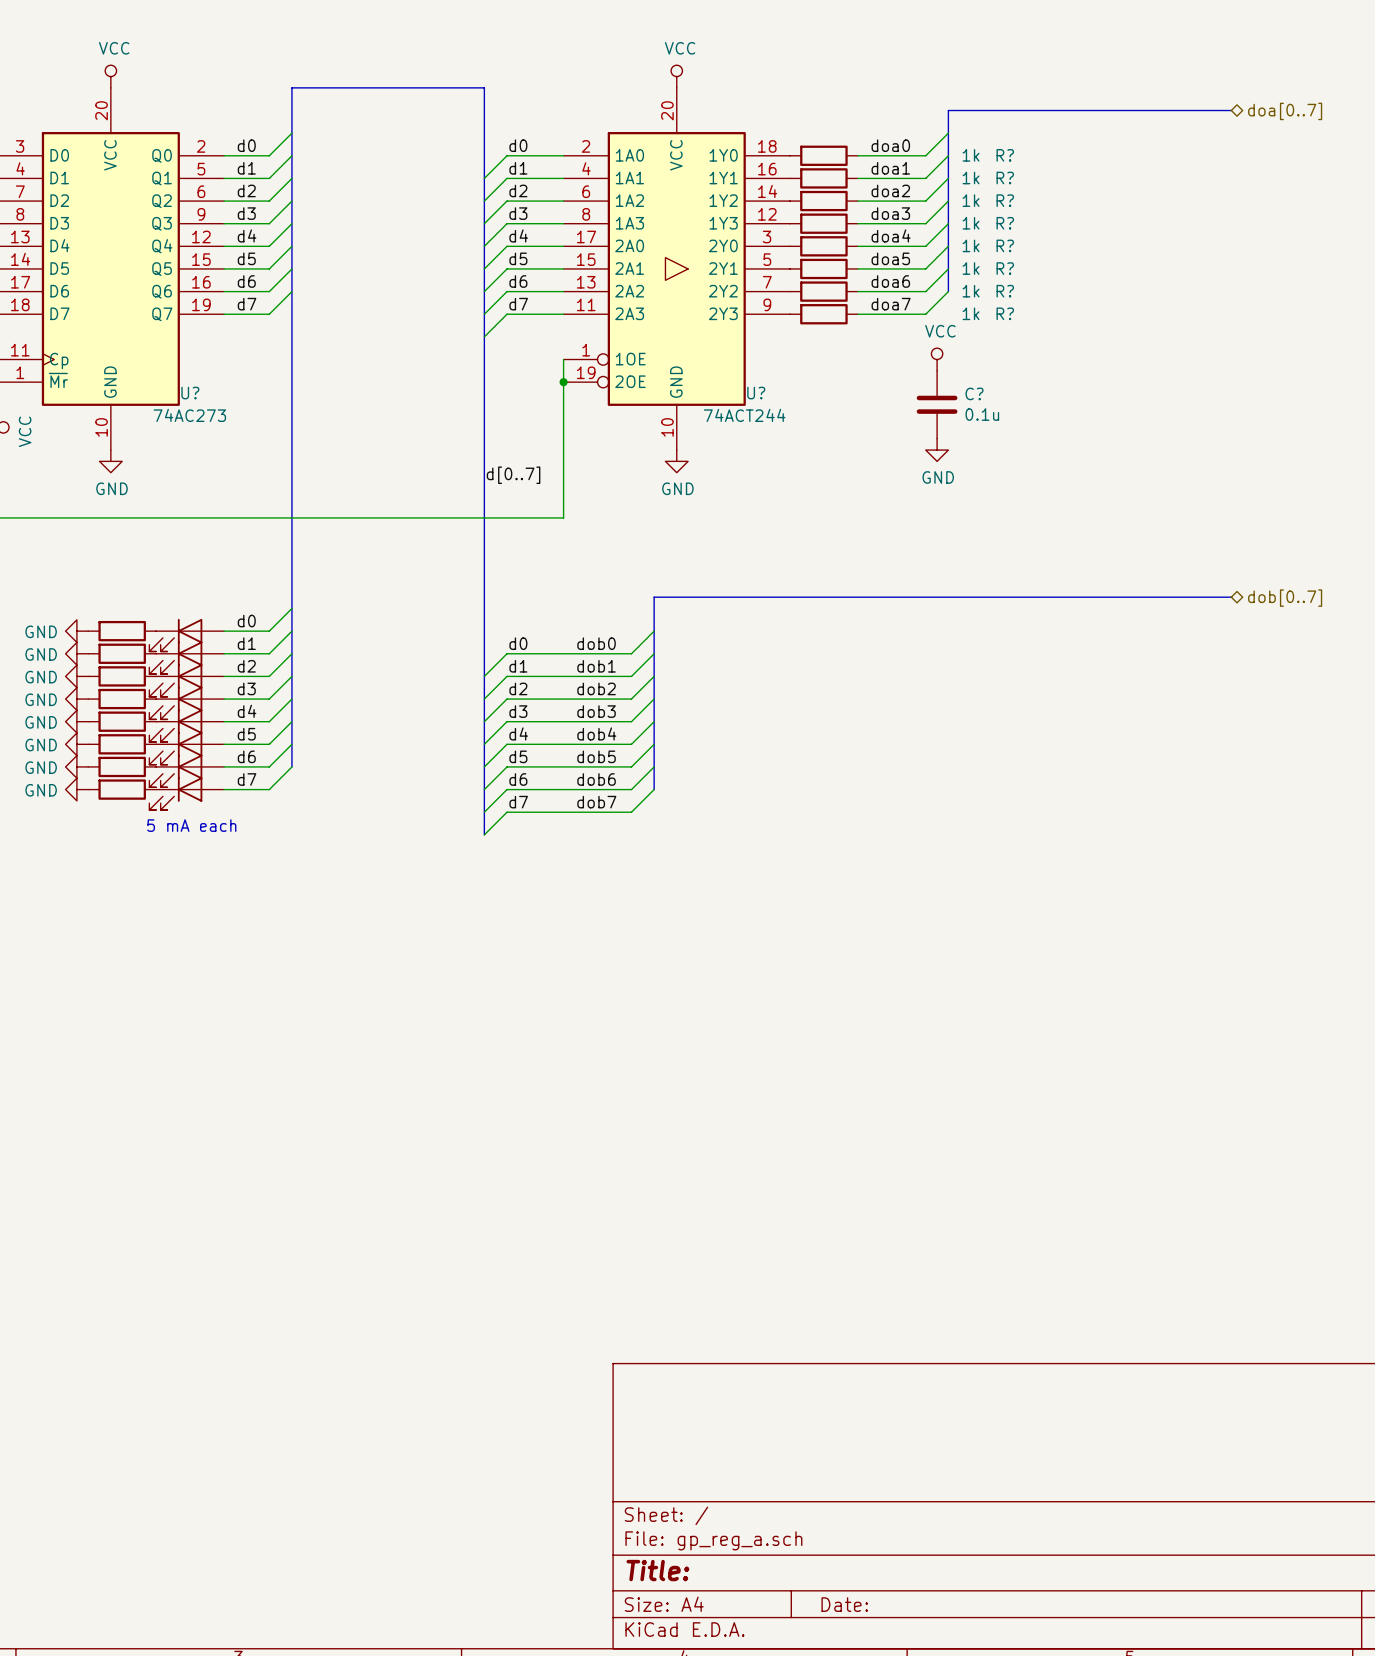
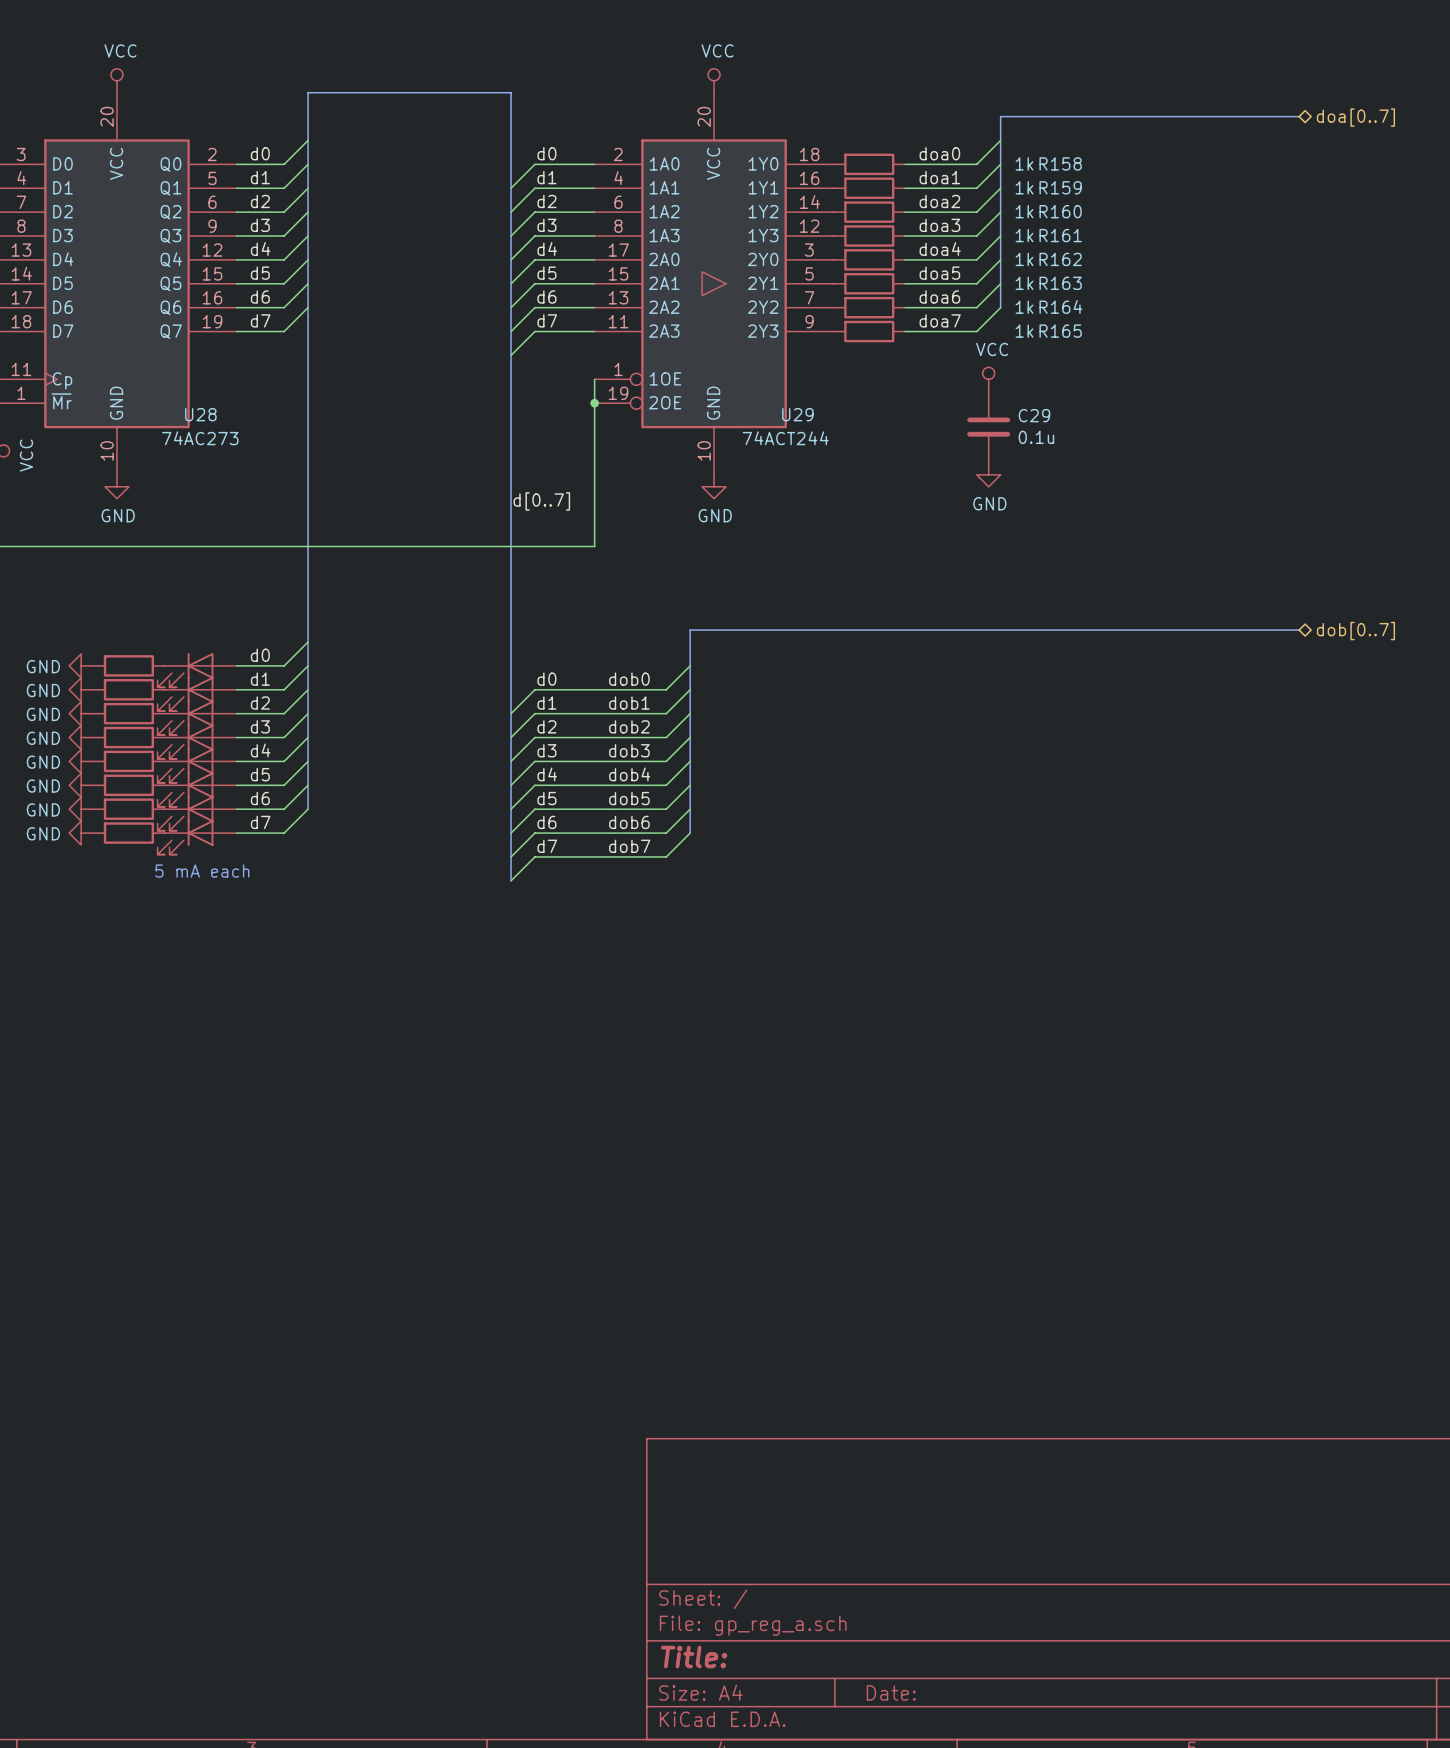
R? name: R? (1005, 155) -> R158 (1060, 163)
R? name: R? (1005, 178) -> R159 (1060, 187)
R? name: R? (1005, 200) -> R160 (1060, 211)
R? name: R? (1005, 223) -> R161 (1060, 235)
R? name: R? (1005, 245) -> R162 (1060, 259)
R? name: R? (1005, 268) -> R163 (1060, 283)
R? name: R? (1005, 291) -> R164 (1060, 306)
R? name: R? (1005, 313) -> R165 (1060, 331)
U? name: U? (190, 393) -> U28 (200, 414)
U? name: U? (756, 393) -> U29 (797, 414)
C? name: C? (974, 393) -> C29 (1034, 415)

